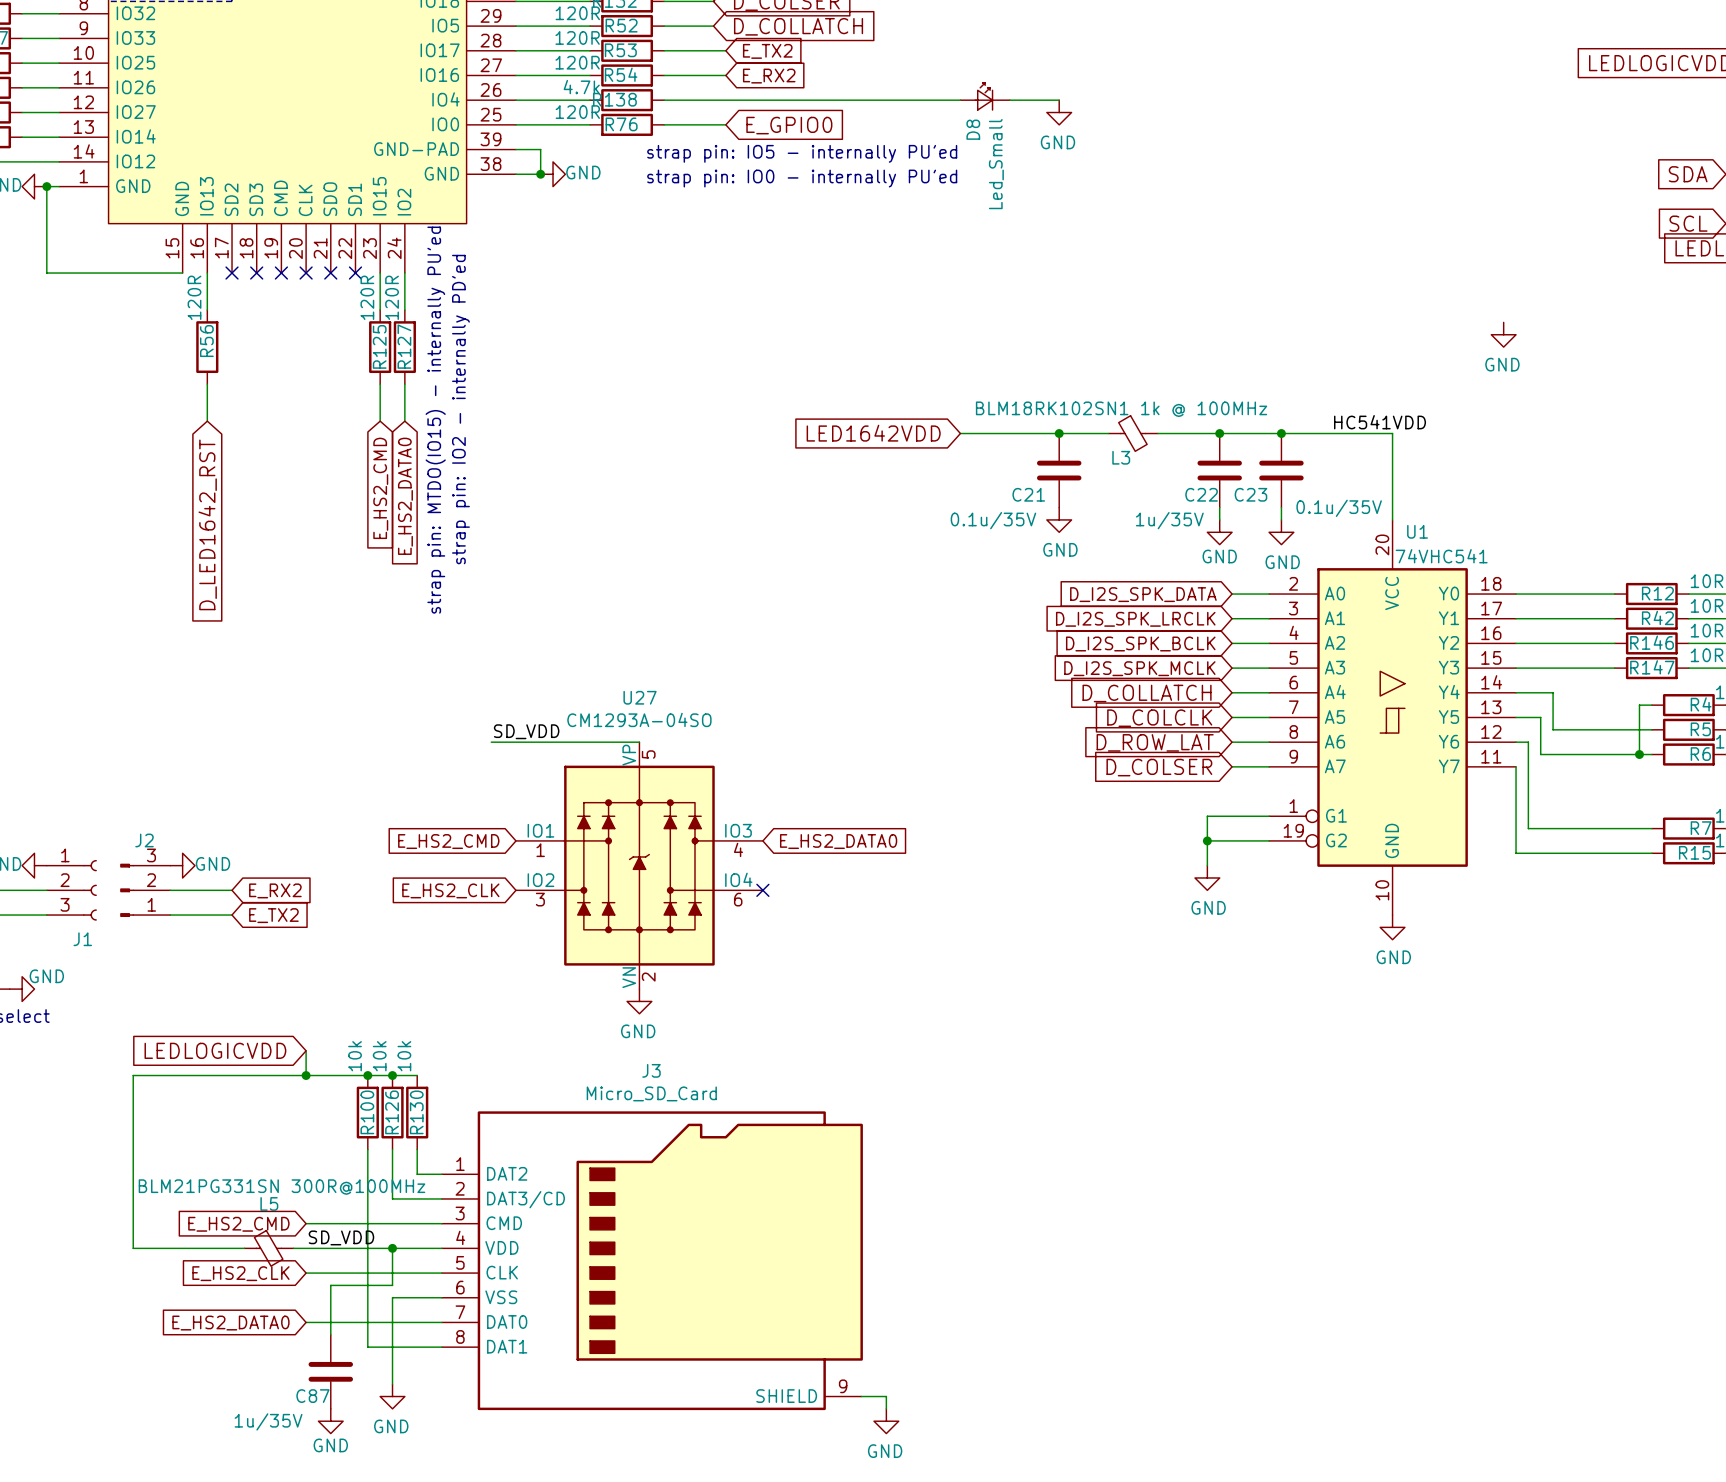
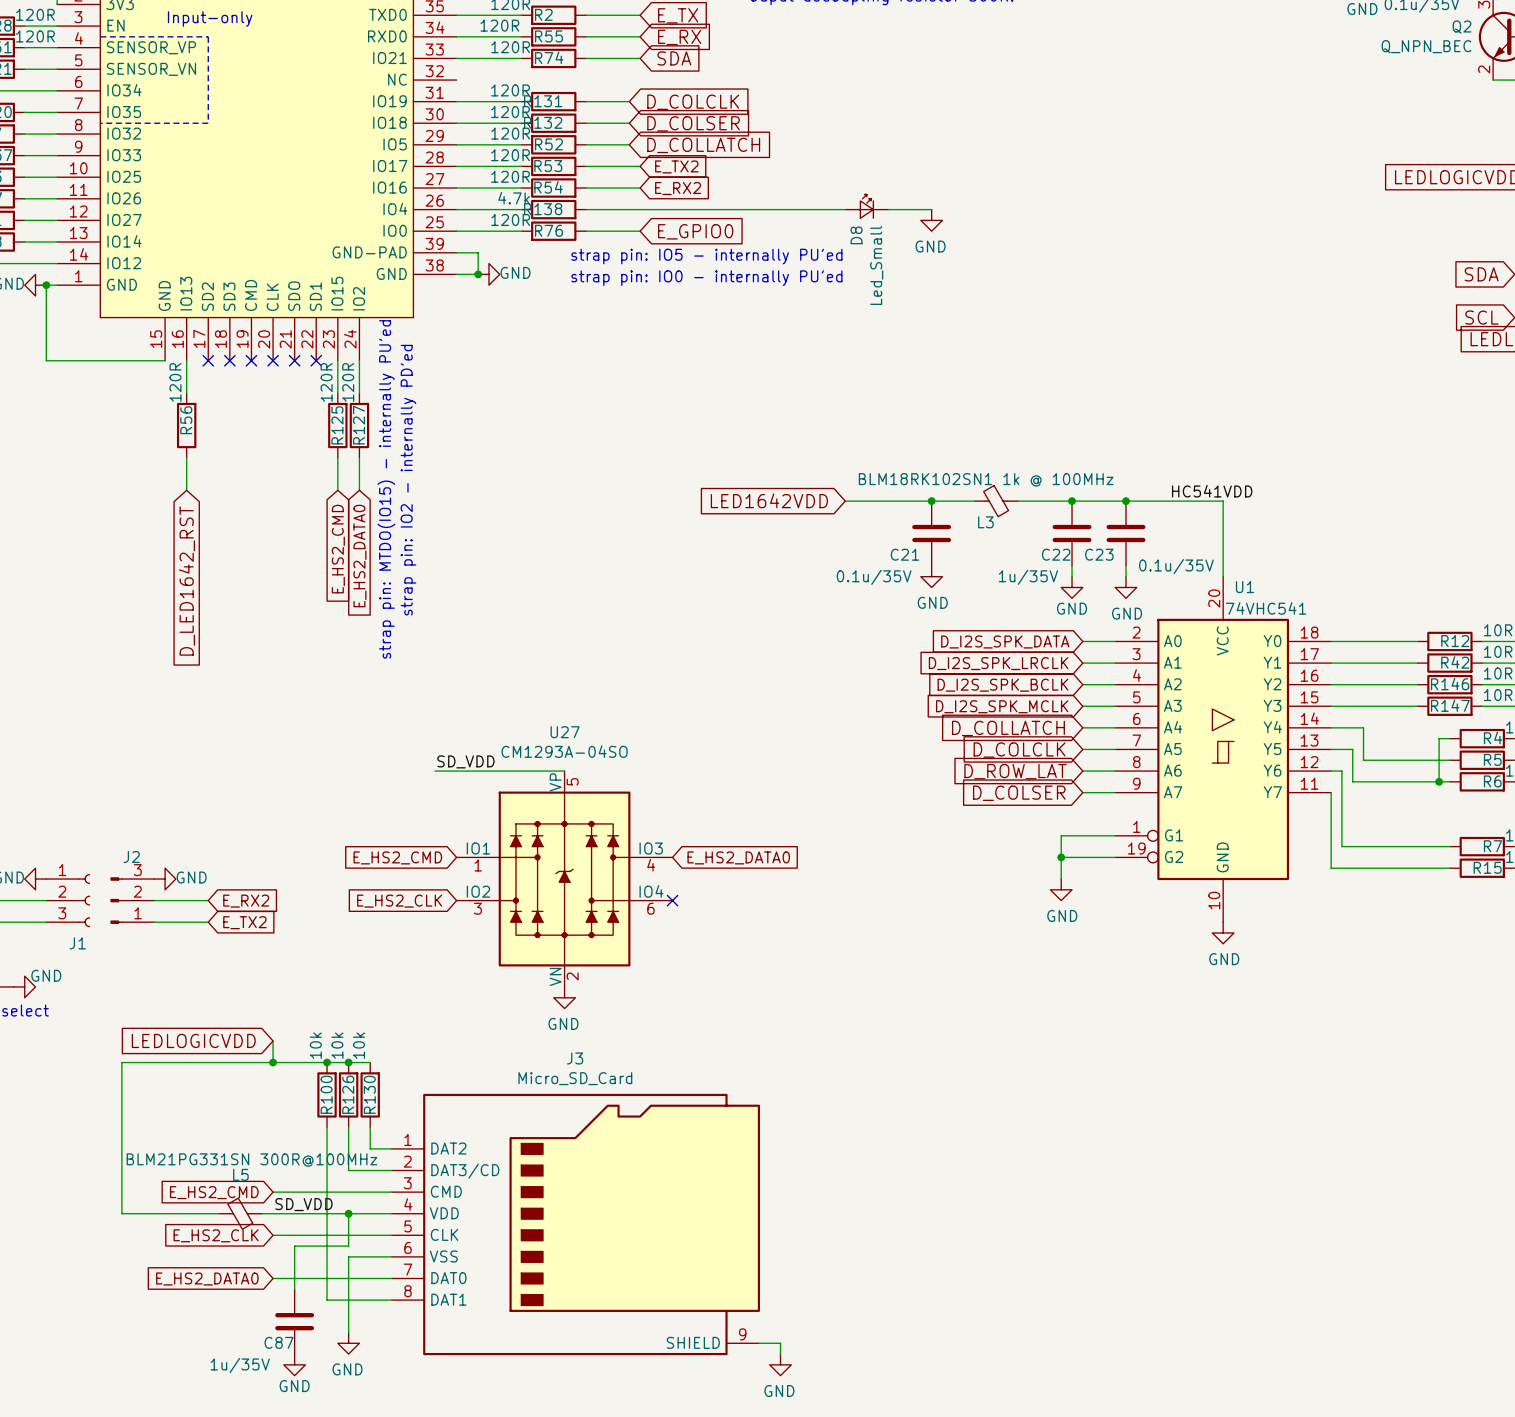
power symbol: GND (1503, 334) -> none

